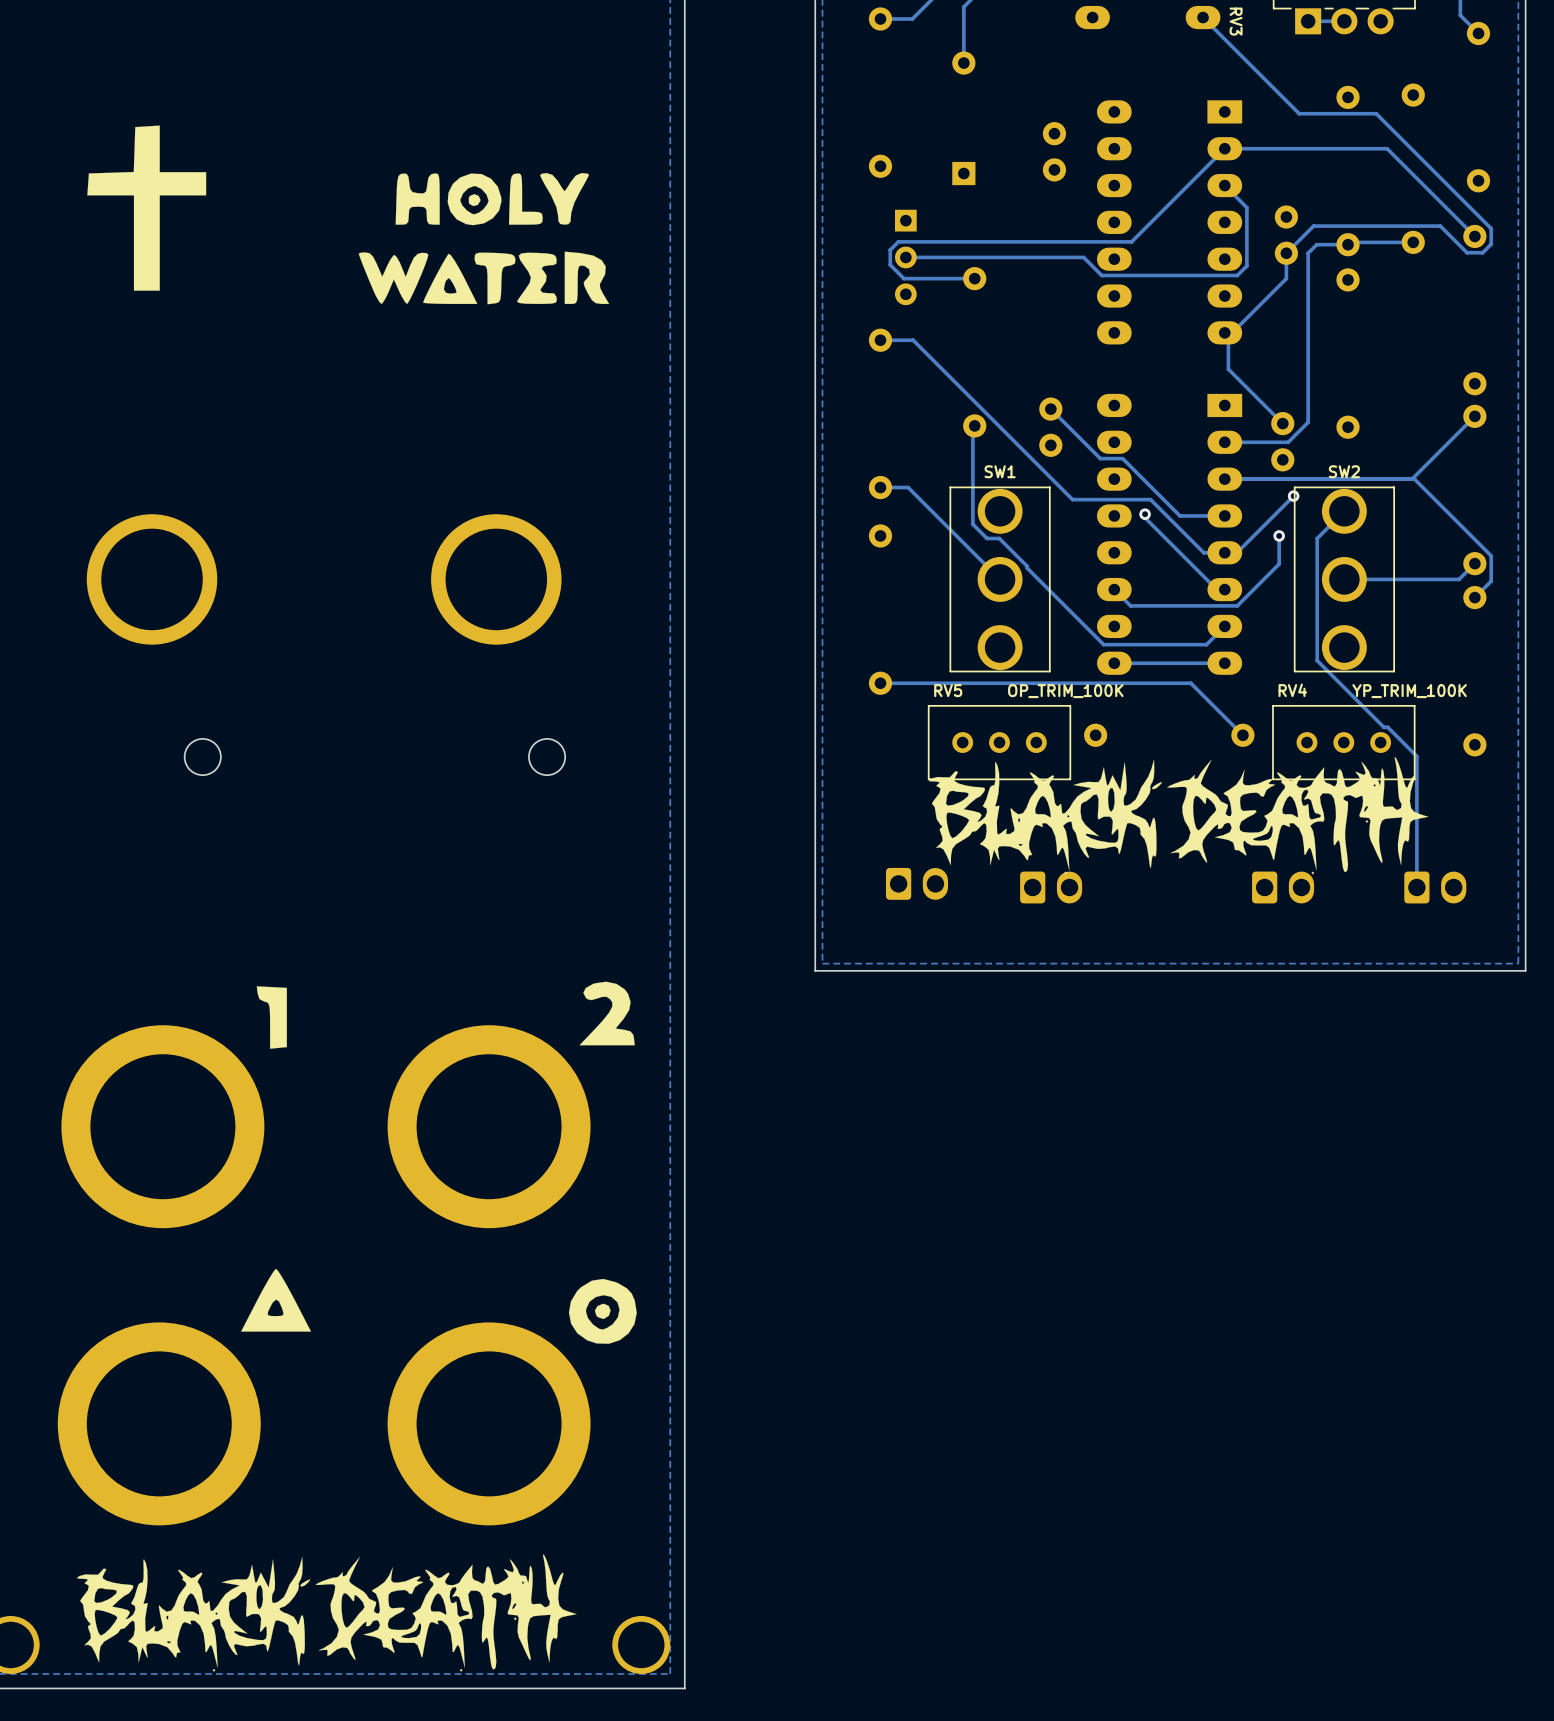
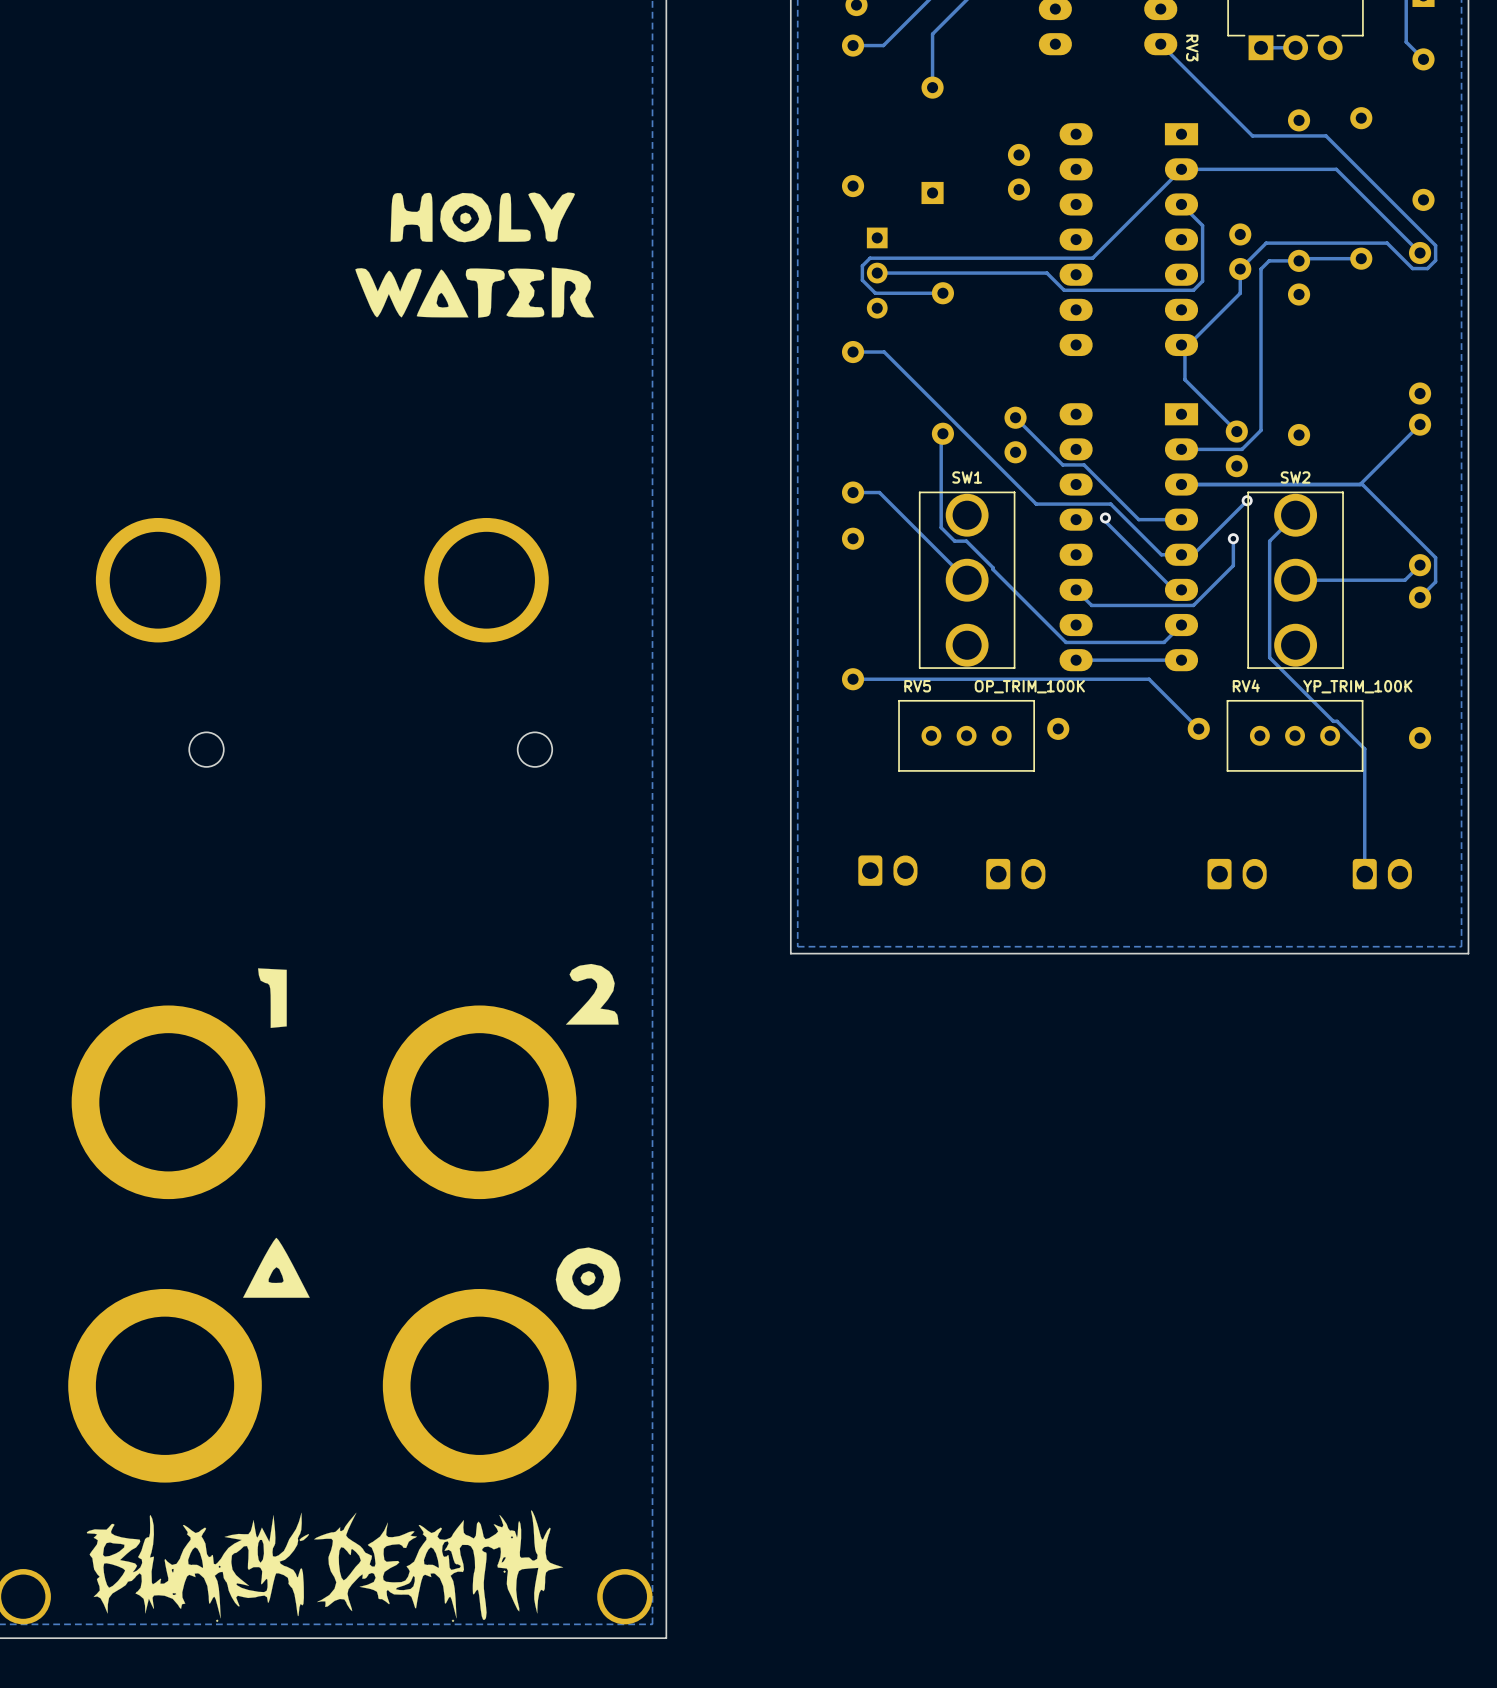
drawing: [87, 125, 207, 291] -> none
drawing: [928, 757, 1429, 875] -> none

